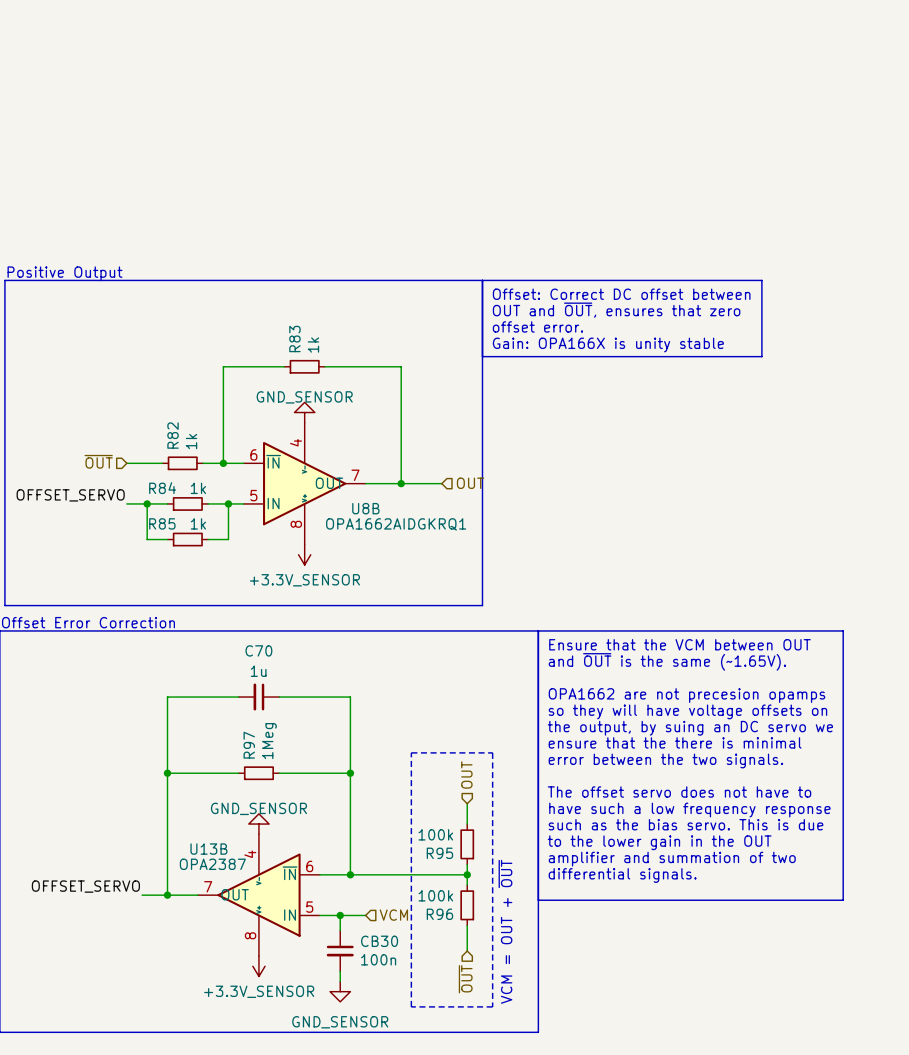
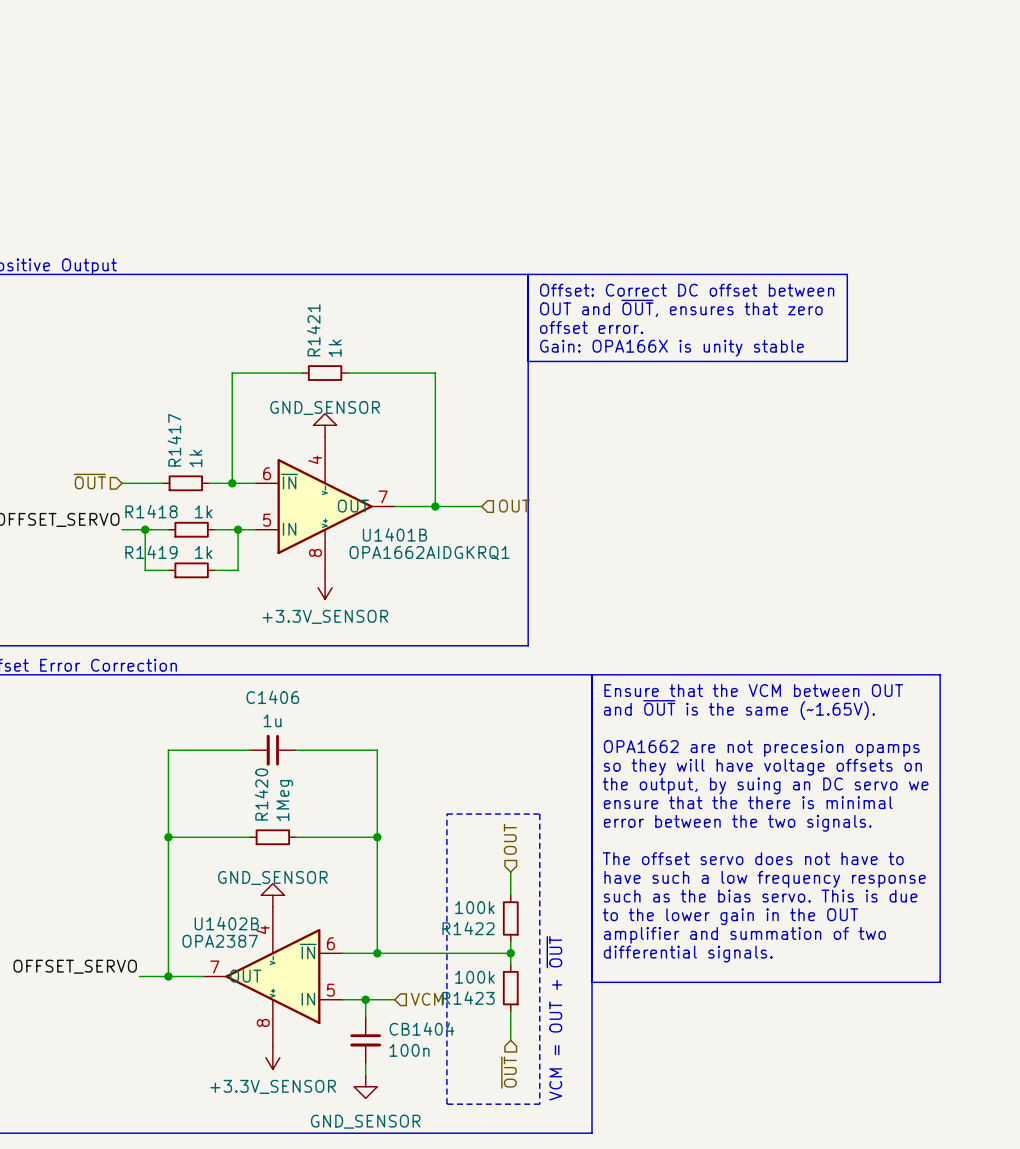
R83 name: R83 (294, 339) -> R1421 (313, 330)
R82 name: R82 (173, 435) -> R1417 (174, 440)
R84 name: R84 (162, 488) -> R1418 (151, 511)
U8B name: U8B (365, 508) -> U1401B (394, 534)
R85 name: R85 (162, 523) -> R1419 (151, 552)
C70 name: C70 (258, 650) -> C1406 (272, 697)
R97 name: R97 (249, 745) -> R1420 (261, 794)
U13B name: U13B (208, 849) -> U1402B (226, 923)
R95 name: R95 (439, 853) -> R1422 (468, 928)
R96 name: R96 (439, 914) -> R1423 (468, 998)
CB30 name: CB30 (379, 941) -> CB1404 (421, 1028)

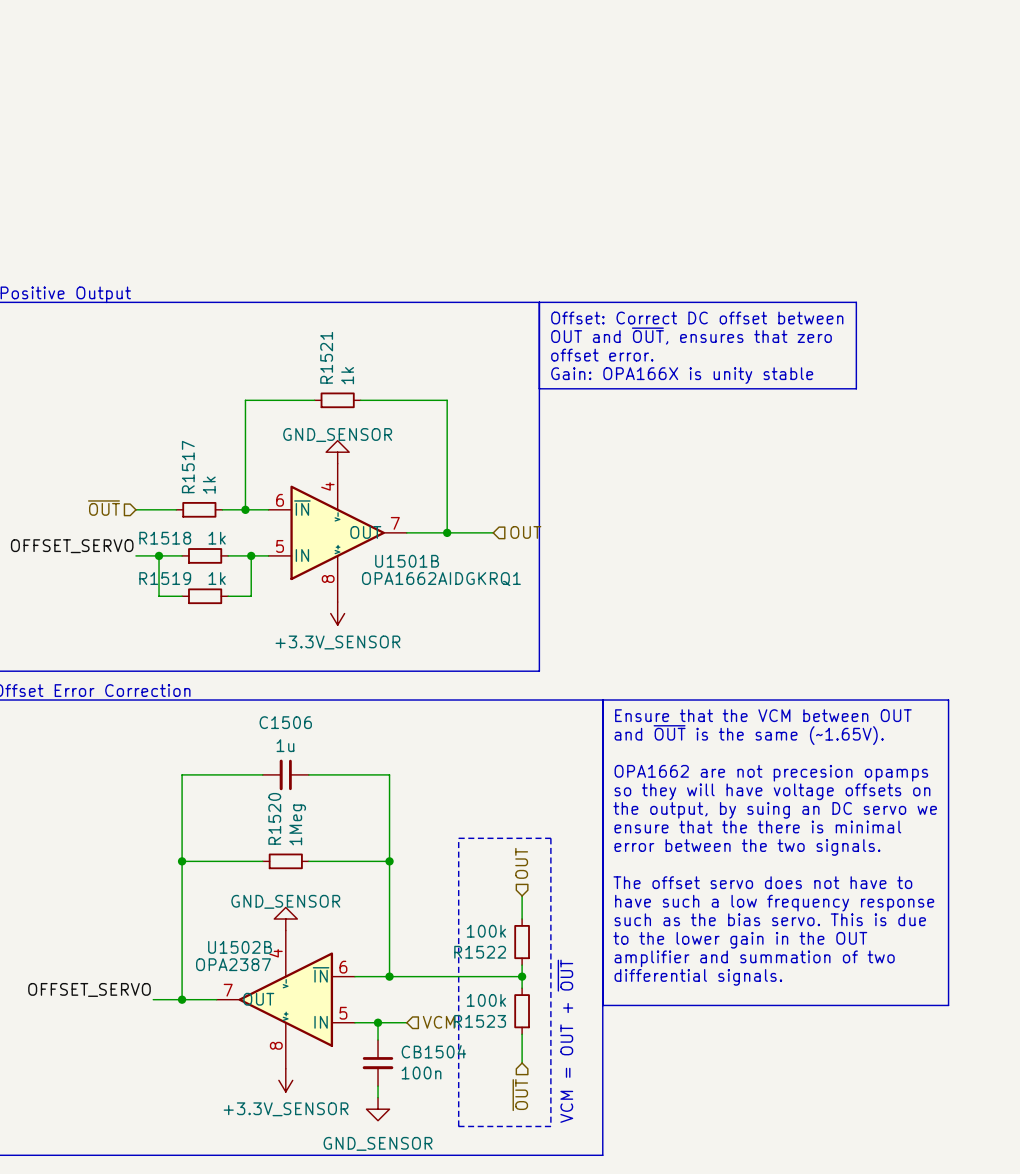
R1421 name: R1421 (313, 330) -> R1521 (326, 357)
R1417 name: R1417 (174, 440) -> R1517 (188, 467)
R1418 name: R1418 (151, 511) -> R1518 (165, 538)
U1401B name: U1401B (394, 534) -> U1501B (407, 561)
R1419 name: R1419 (151, 552) -> R1519 (165, 578)
C1406 name: C1406 (272, 697) -> C1506 (285, 722)
R1420 name: R1420 (261, 794) -> R1520 (274, 818)
U1402B name: U1402B (226, 923) -> U1502B (240, 947)
R1422 name: R1422 (468, 928) -> R1522 (480, 952)
R1423 name: R1423 (468, 998) -> R1523 (480, 1021)
CB1404 name: CB1404 (421, 1028) -> CB1504 (433, 1051)

